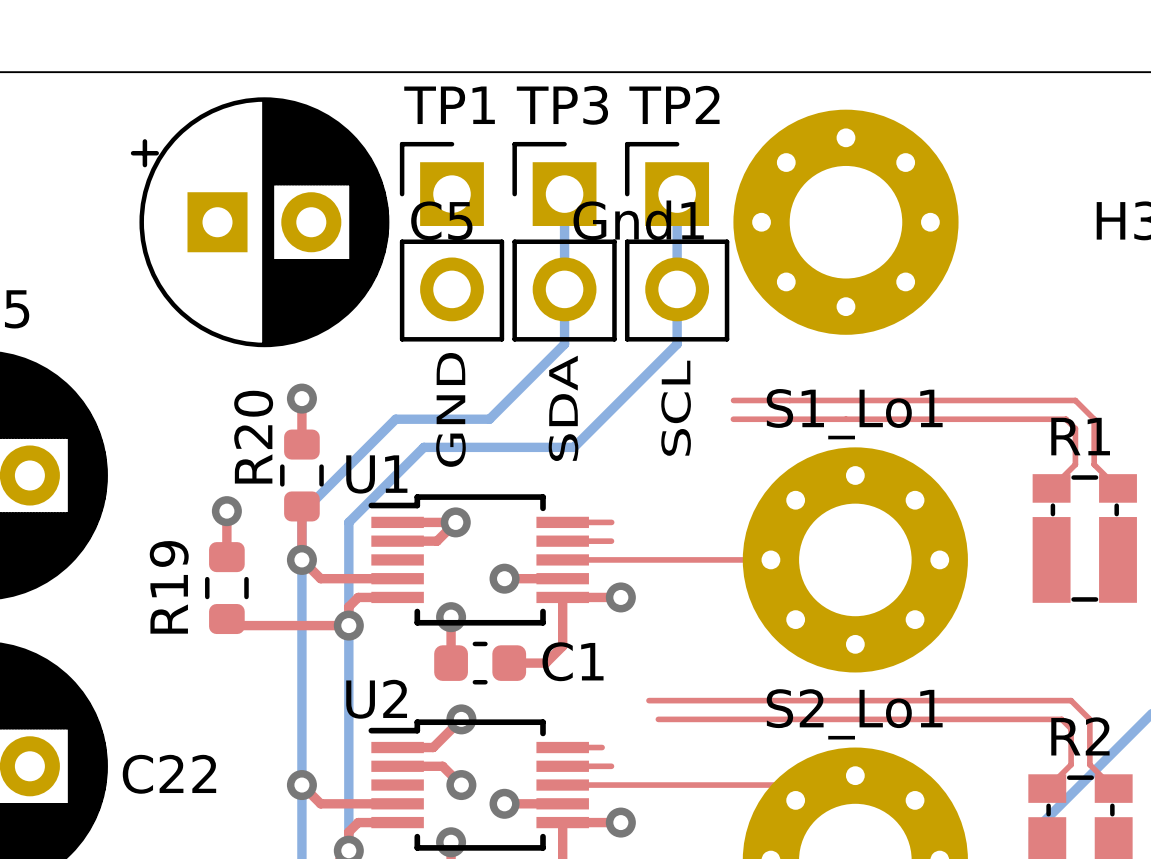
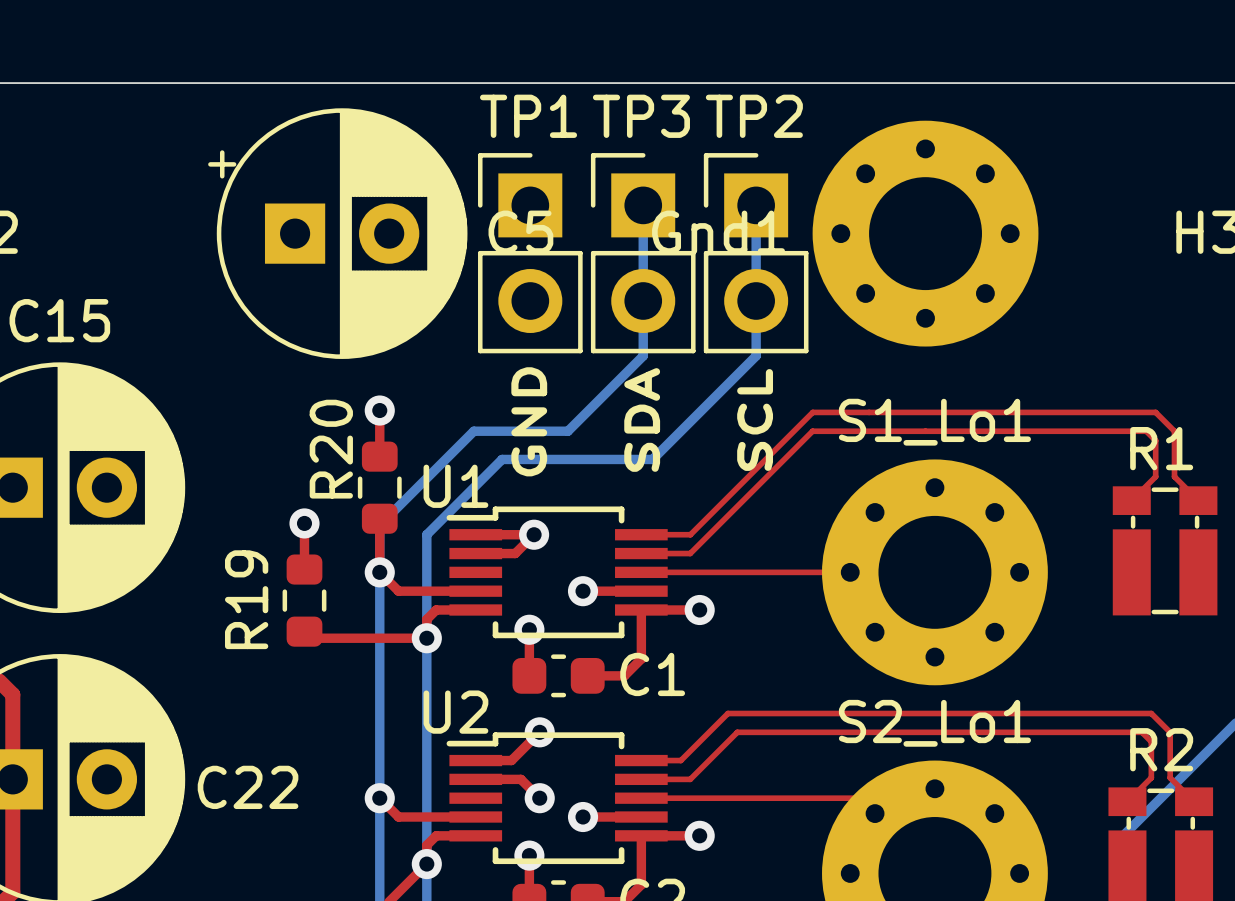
top track: none -> (812, 412) (690, 534)
top track: none -> (812, 431) (690, 553)
top track: none -> (727, 713) (680, 760)
top track: none -> (737, 732) (690, 779)

